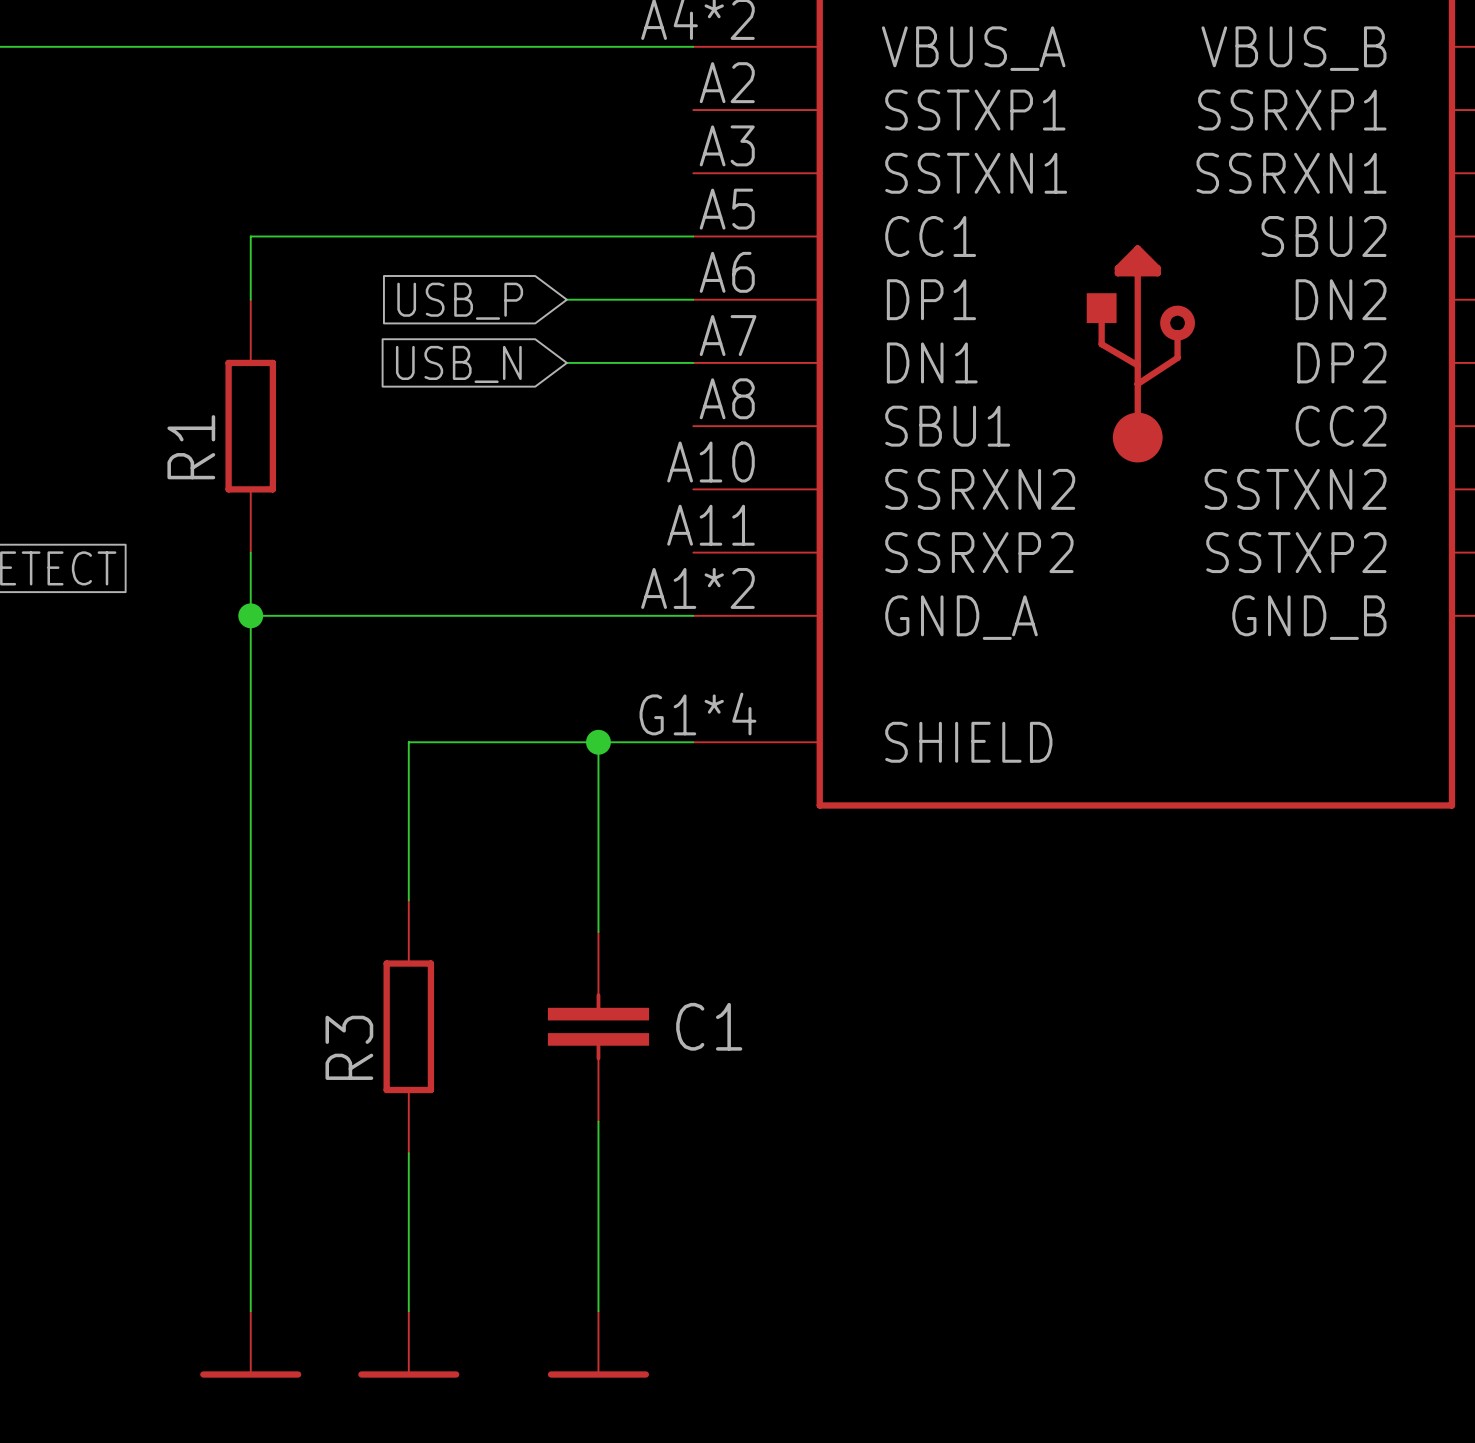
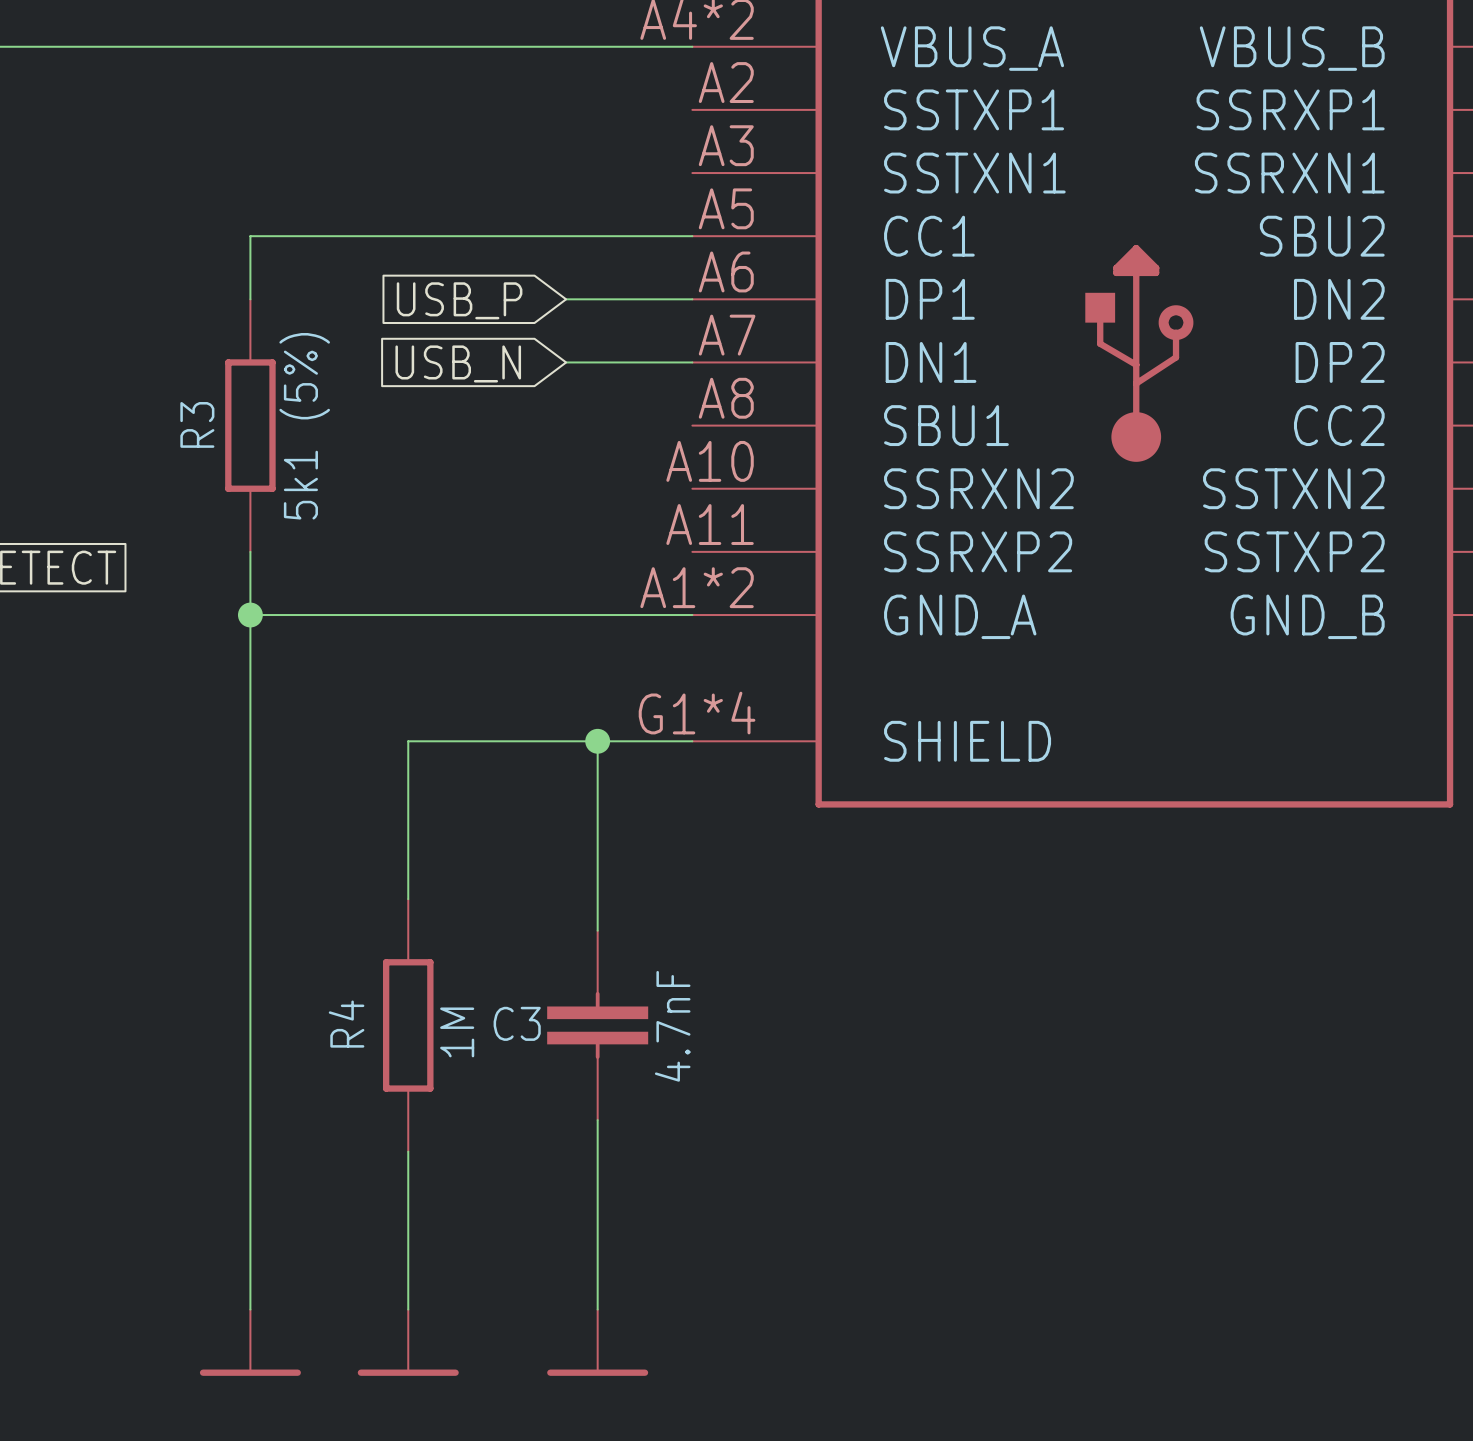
R1 value: none -> 5k1 (5%) (304, 426)
R1 name: R1 (191, 447) -> R3 (197, 424)
C1 name: C1 (709, 1026) -> C3 (517, 1023)
C1 value: none -> 4.7nF (672, 1026)
R3 value: none -> 1M (457, 1032)
R3 name: R3 (349, 1047) -> R4 (346, 1024)

